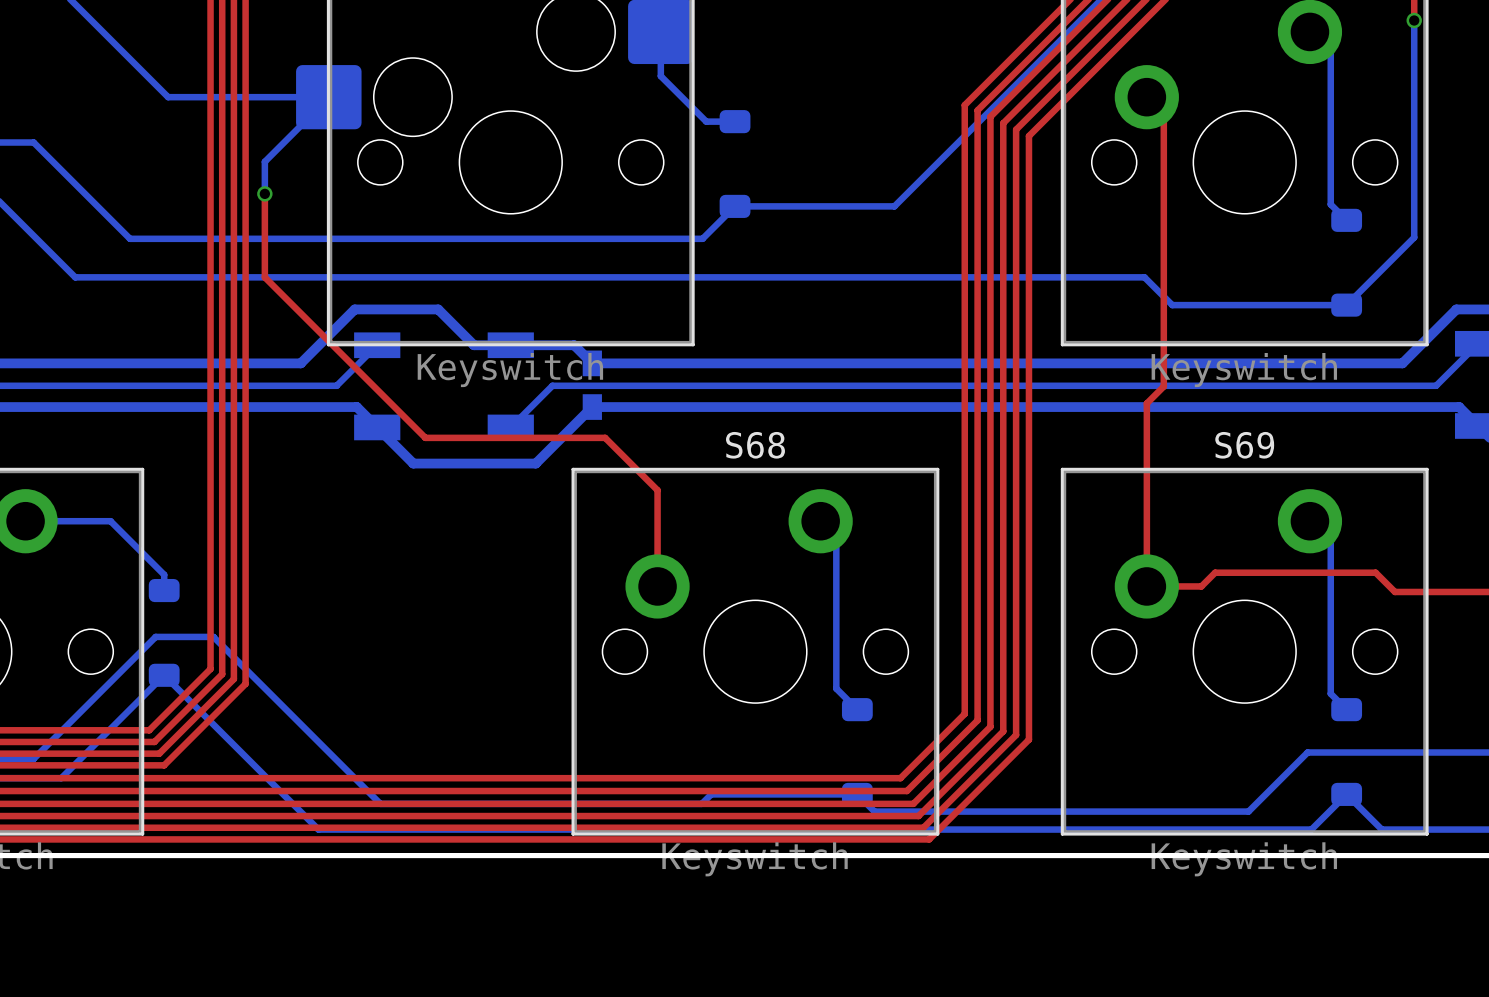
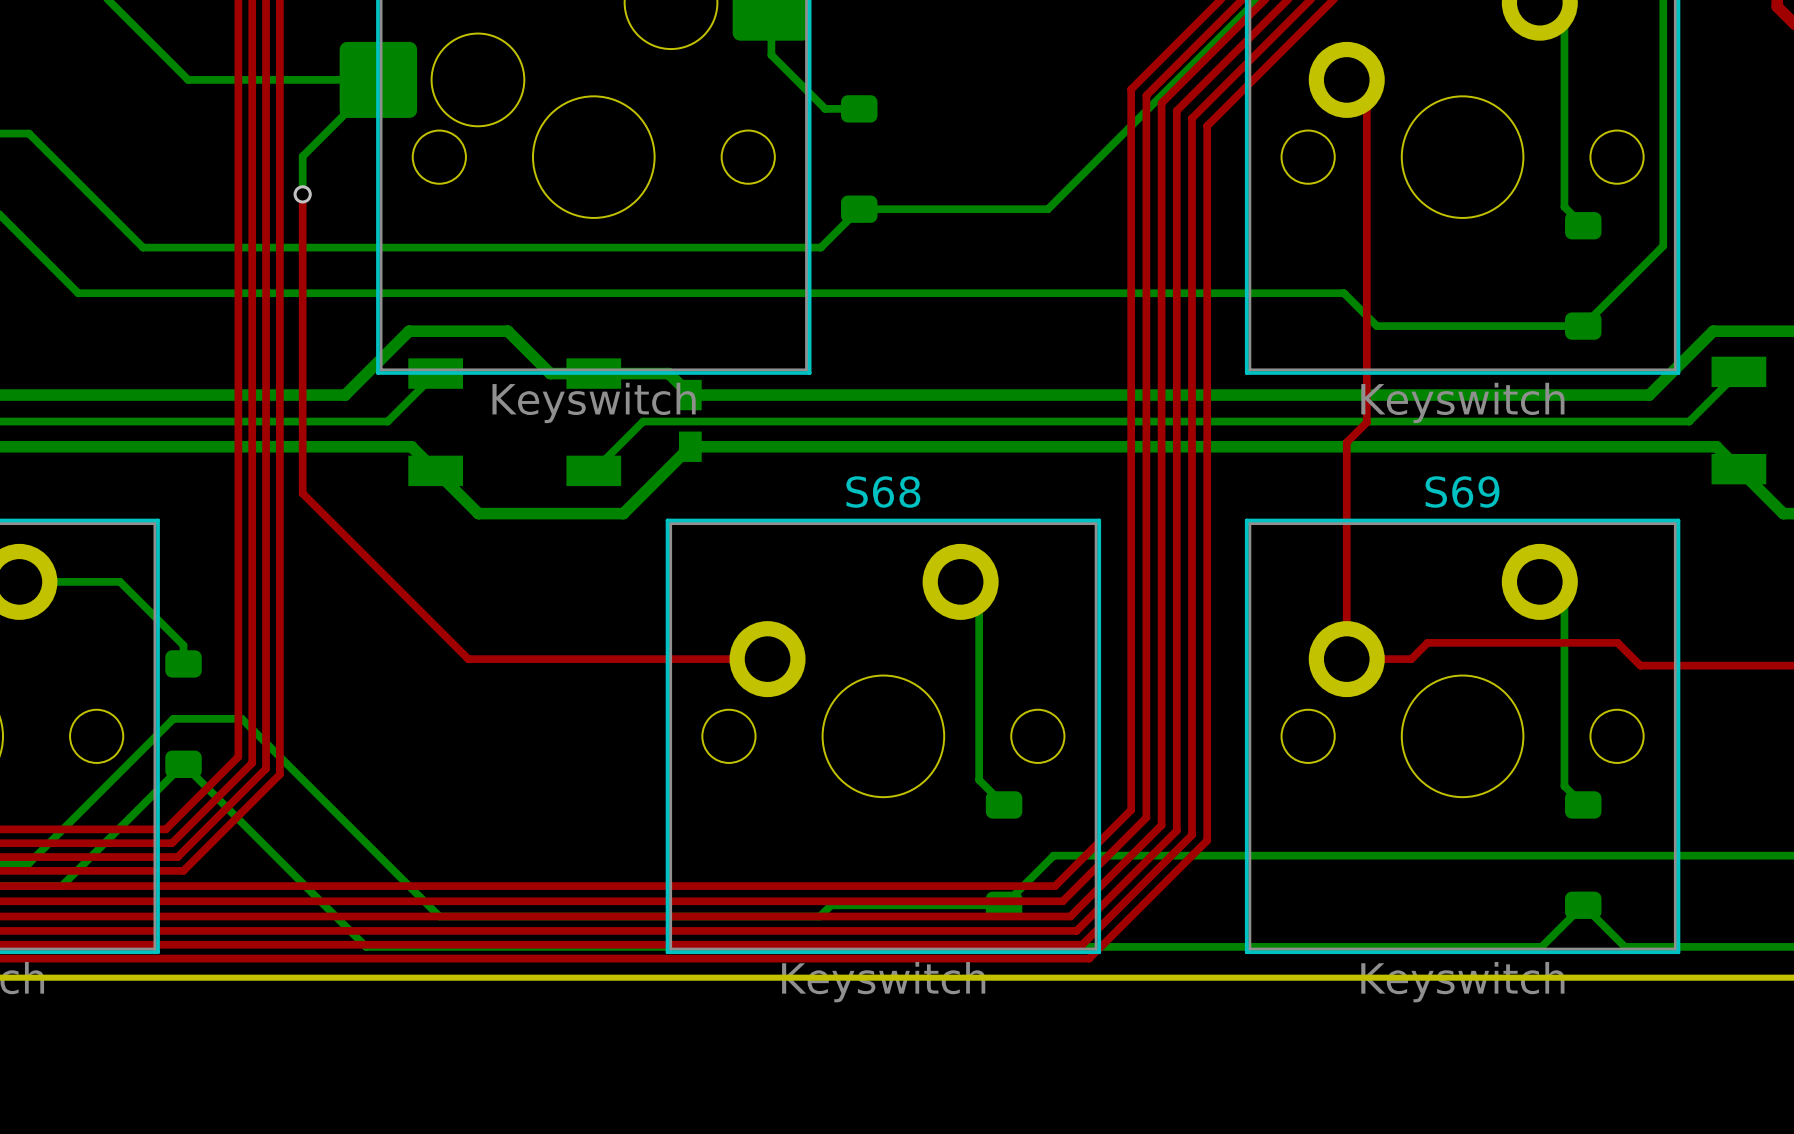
top track: (264, 277) (425, 437) (605, 437) (657, 490) (657, 586) -> (302, 293) (302, 493) (468, 659) (767, 659)
bottom track: (1307, 752) (1248, 811) (874, 811) (857, 794) -> (1537, 855) (1053, 855) (1004, 905)

